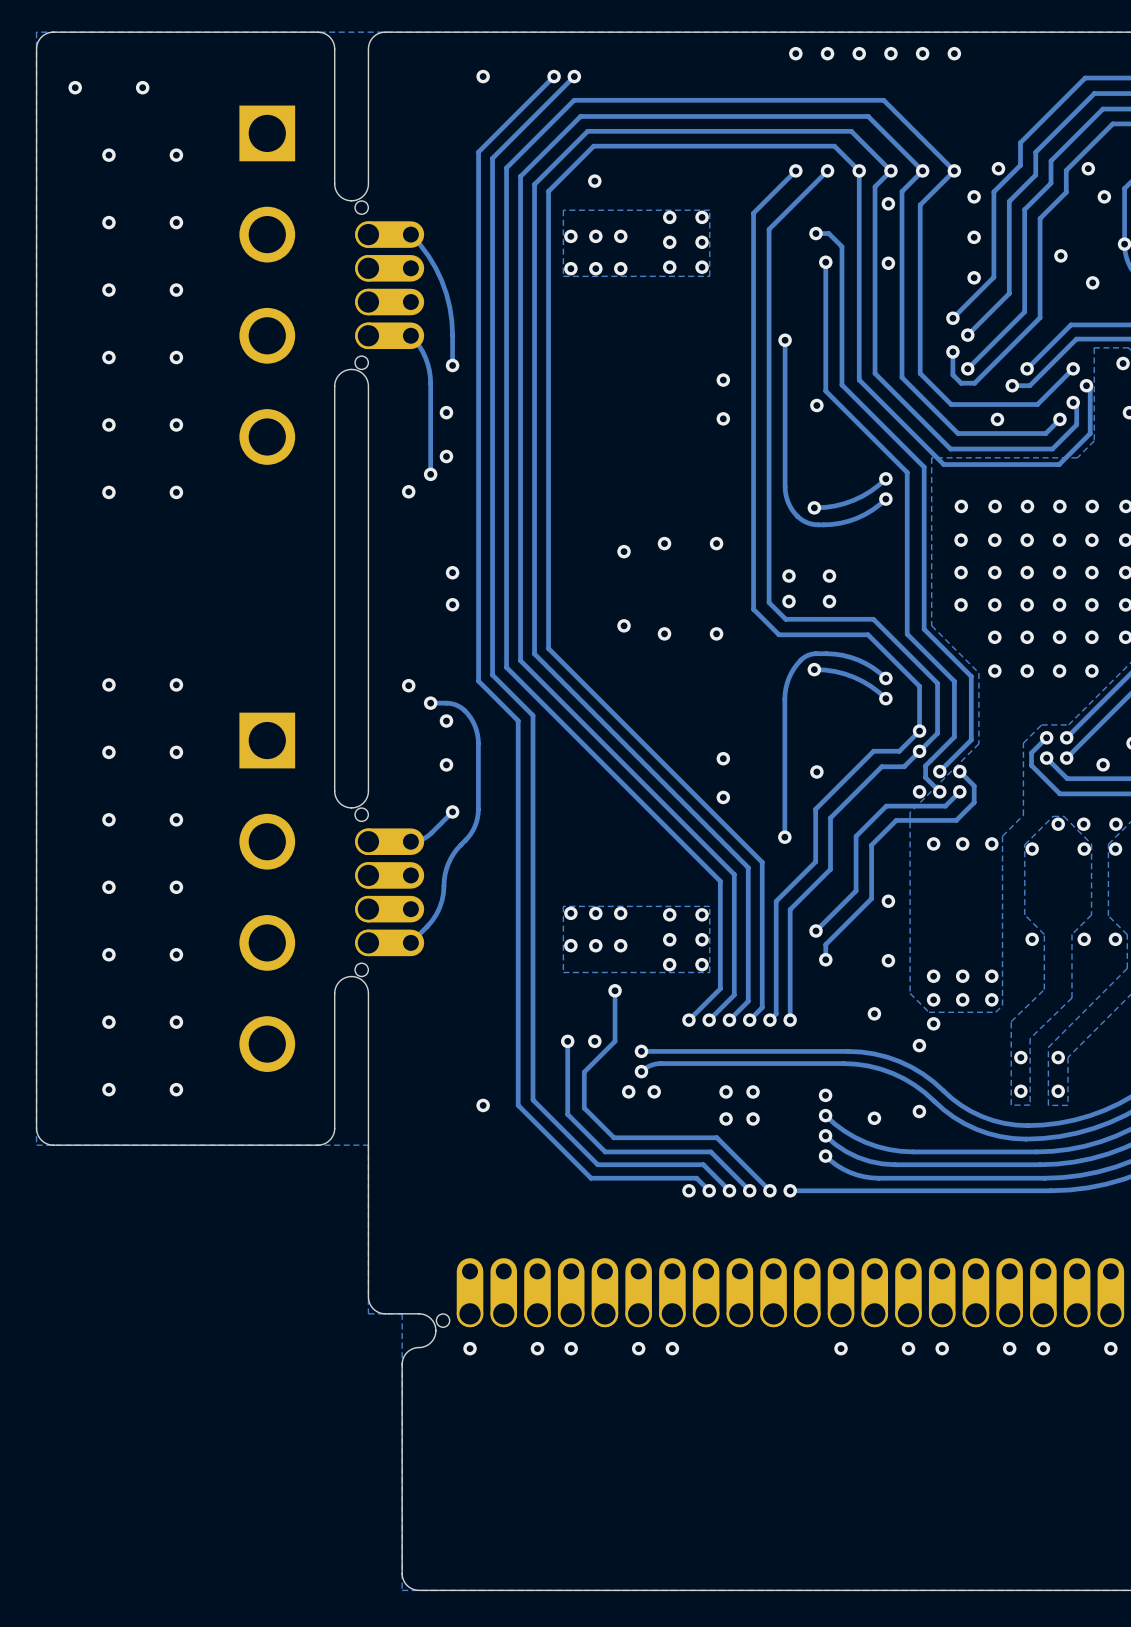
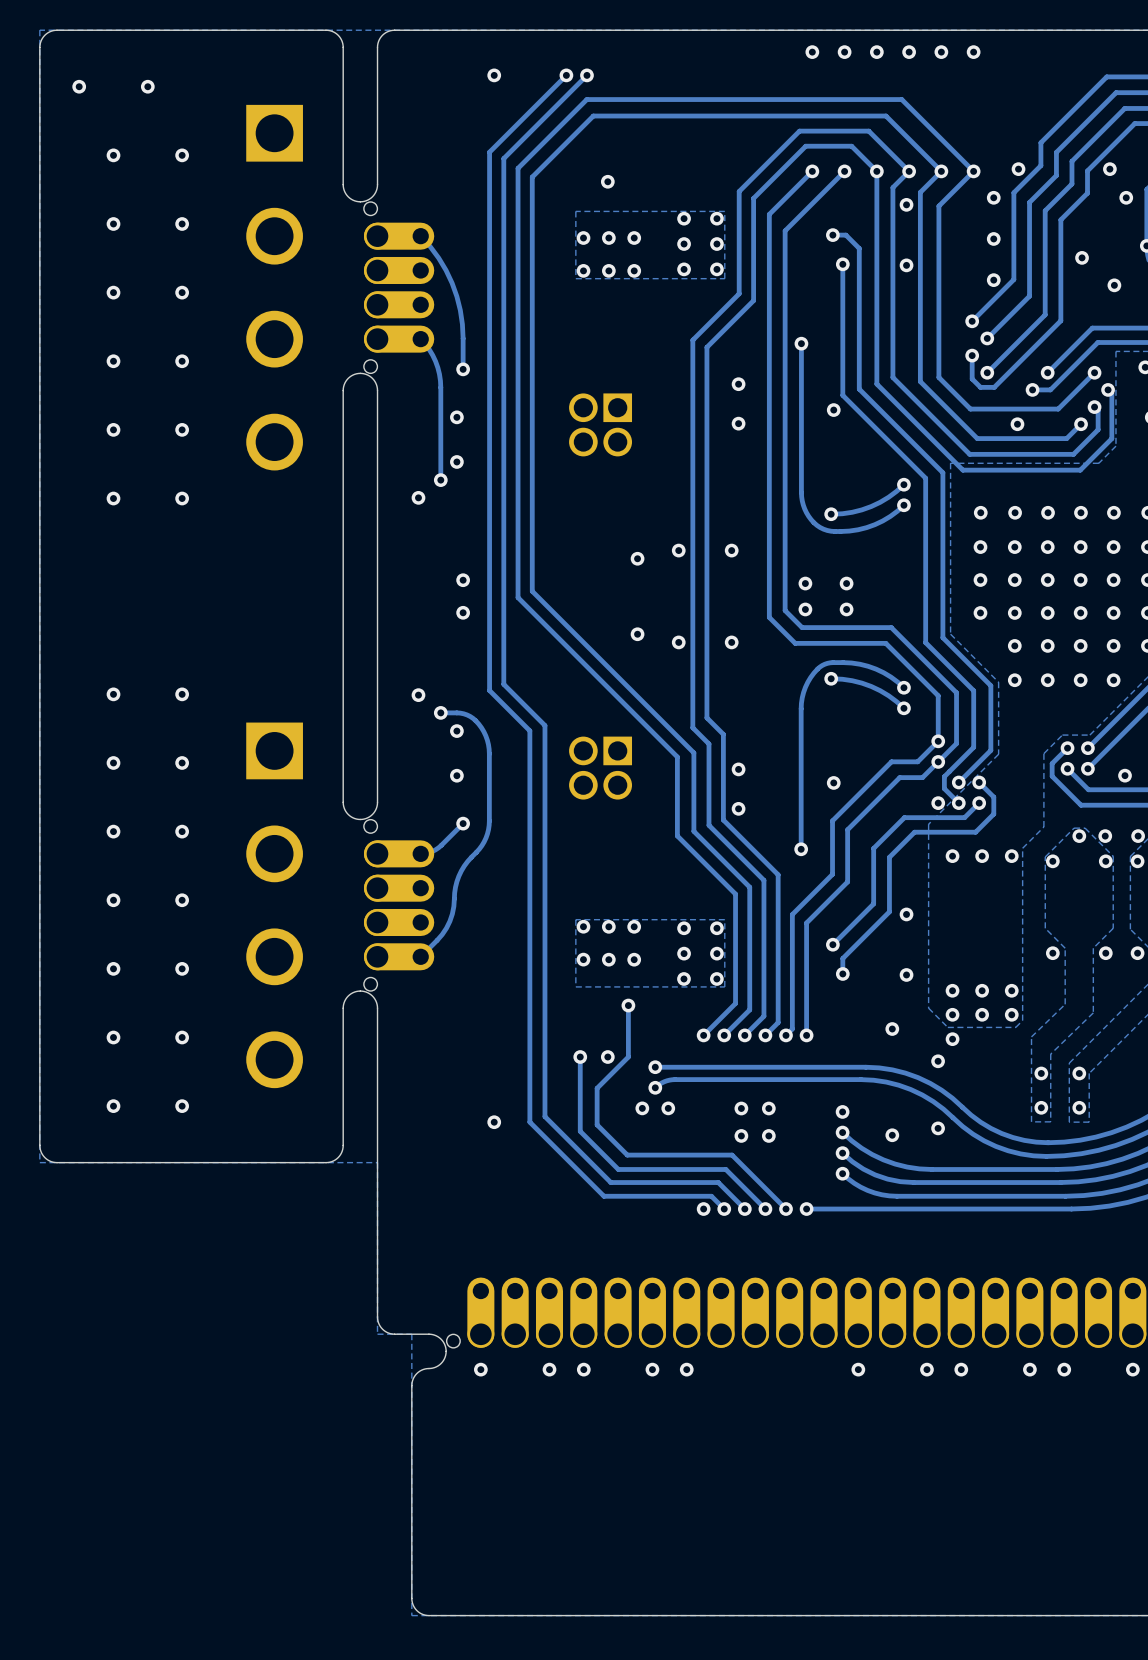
track: (783, 131) (587, 131) (534, 184) (534, 653) (694, 813) -> (799, 131) (739, 191) (739, 293) (692, 340) (692, 727) (708, 743) (708, 825)
track: (789, 146) (593, 146) (548, 191) (548, 648) (708, 808) -> (805, 146) (753, 198) (753, 300) (706, 347) (706, 717) (723, 734) (723, 820)
part: none -> (600, 424)
track: (520, 583) (520, 660) (679, 819) -> (532, 591) (693, 752) (693, 831)
track: (506, 589) (506, 667) (663, 824) -> (518, 597) (677, 757) (677, 835)
part: none -> (600, 768)

